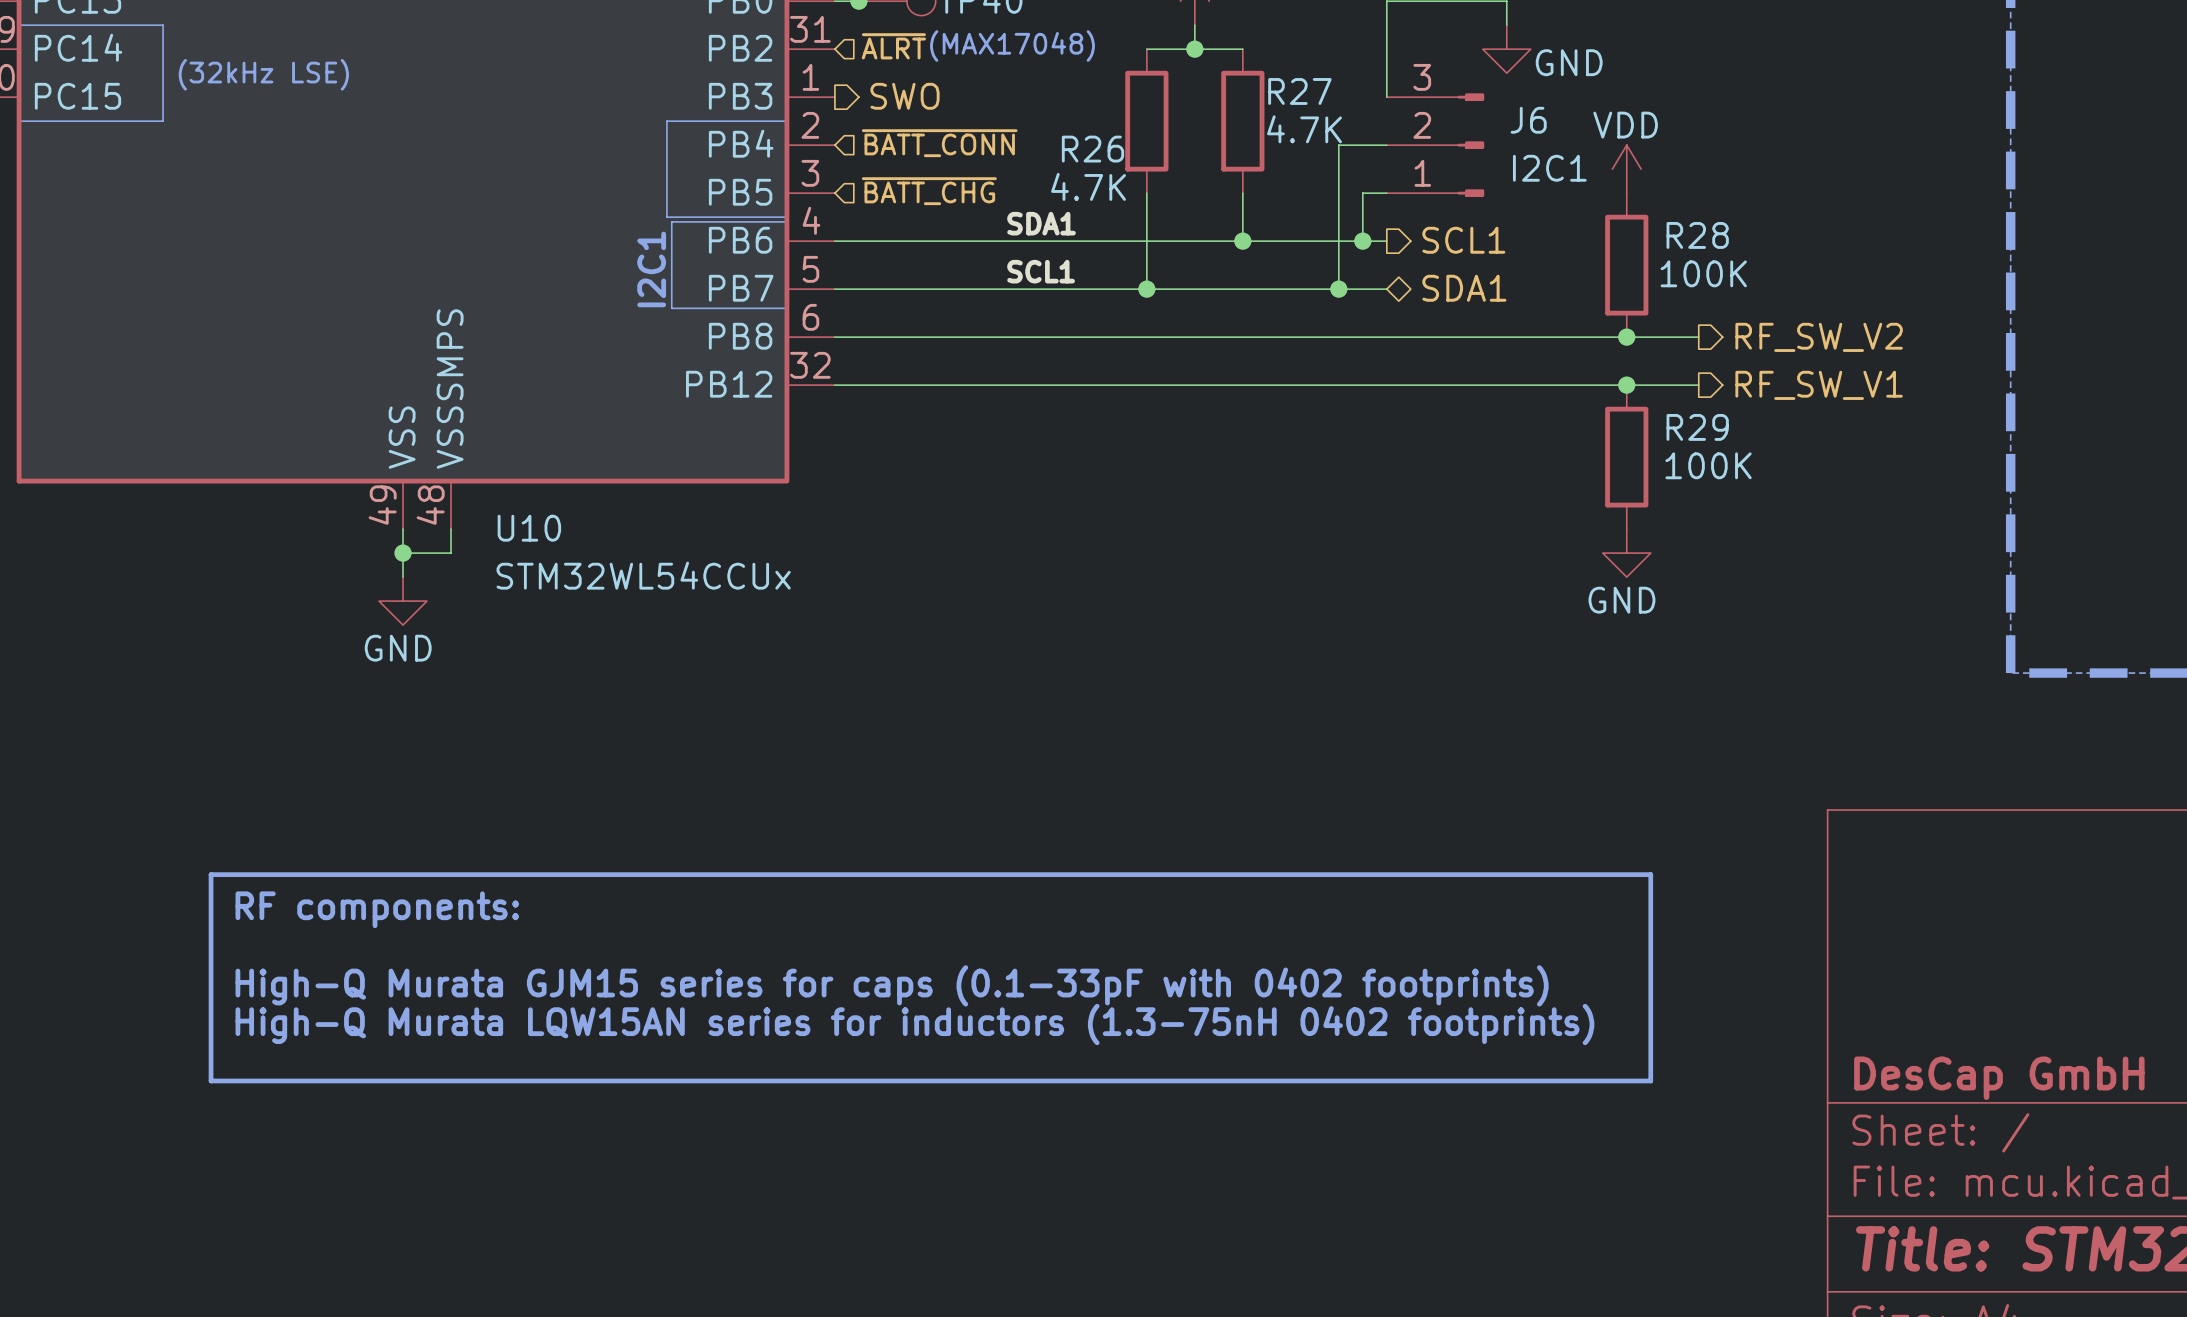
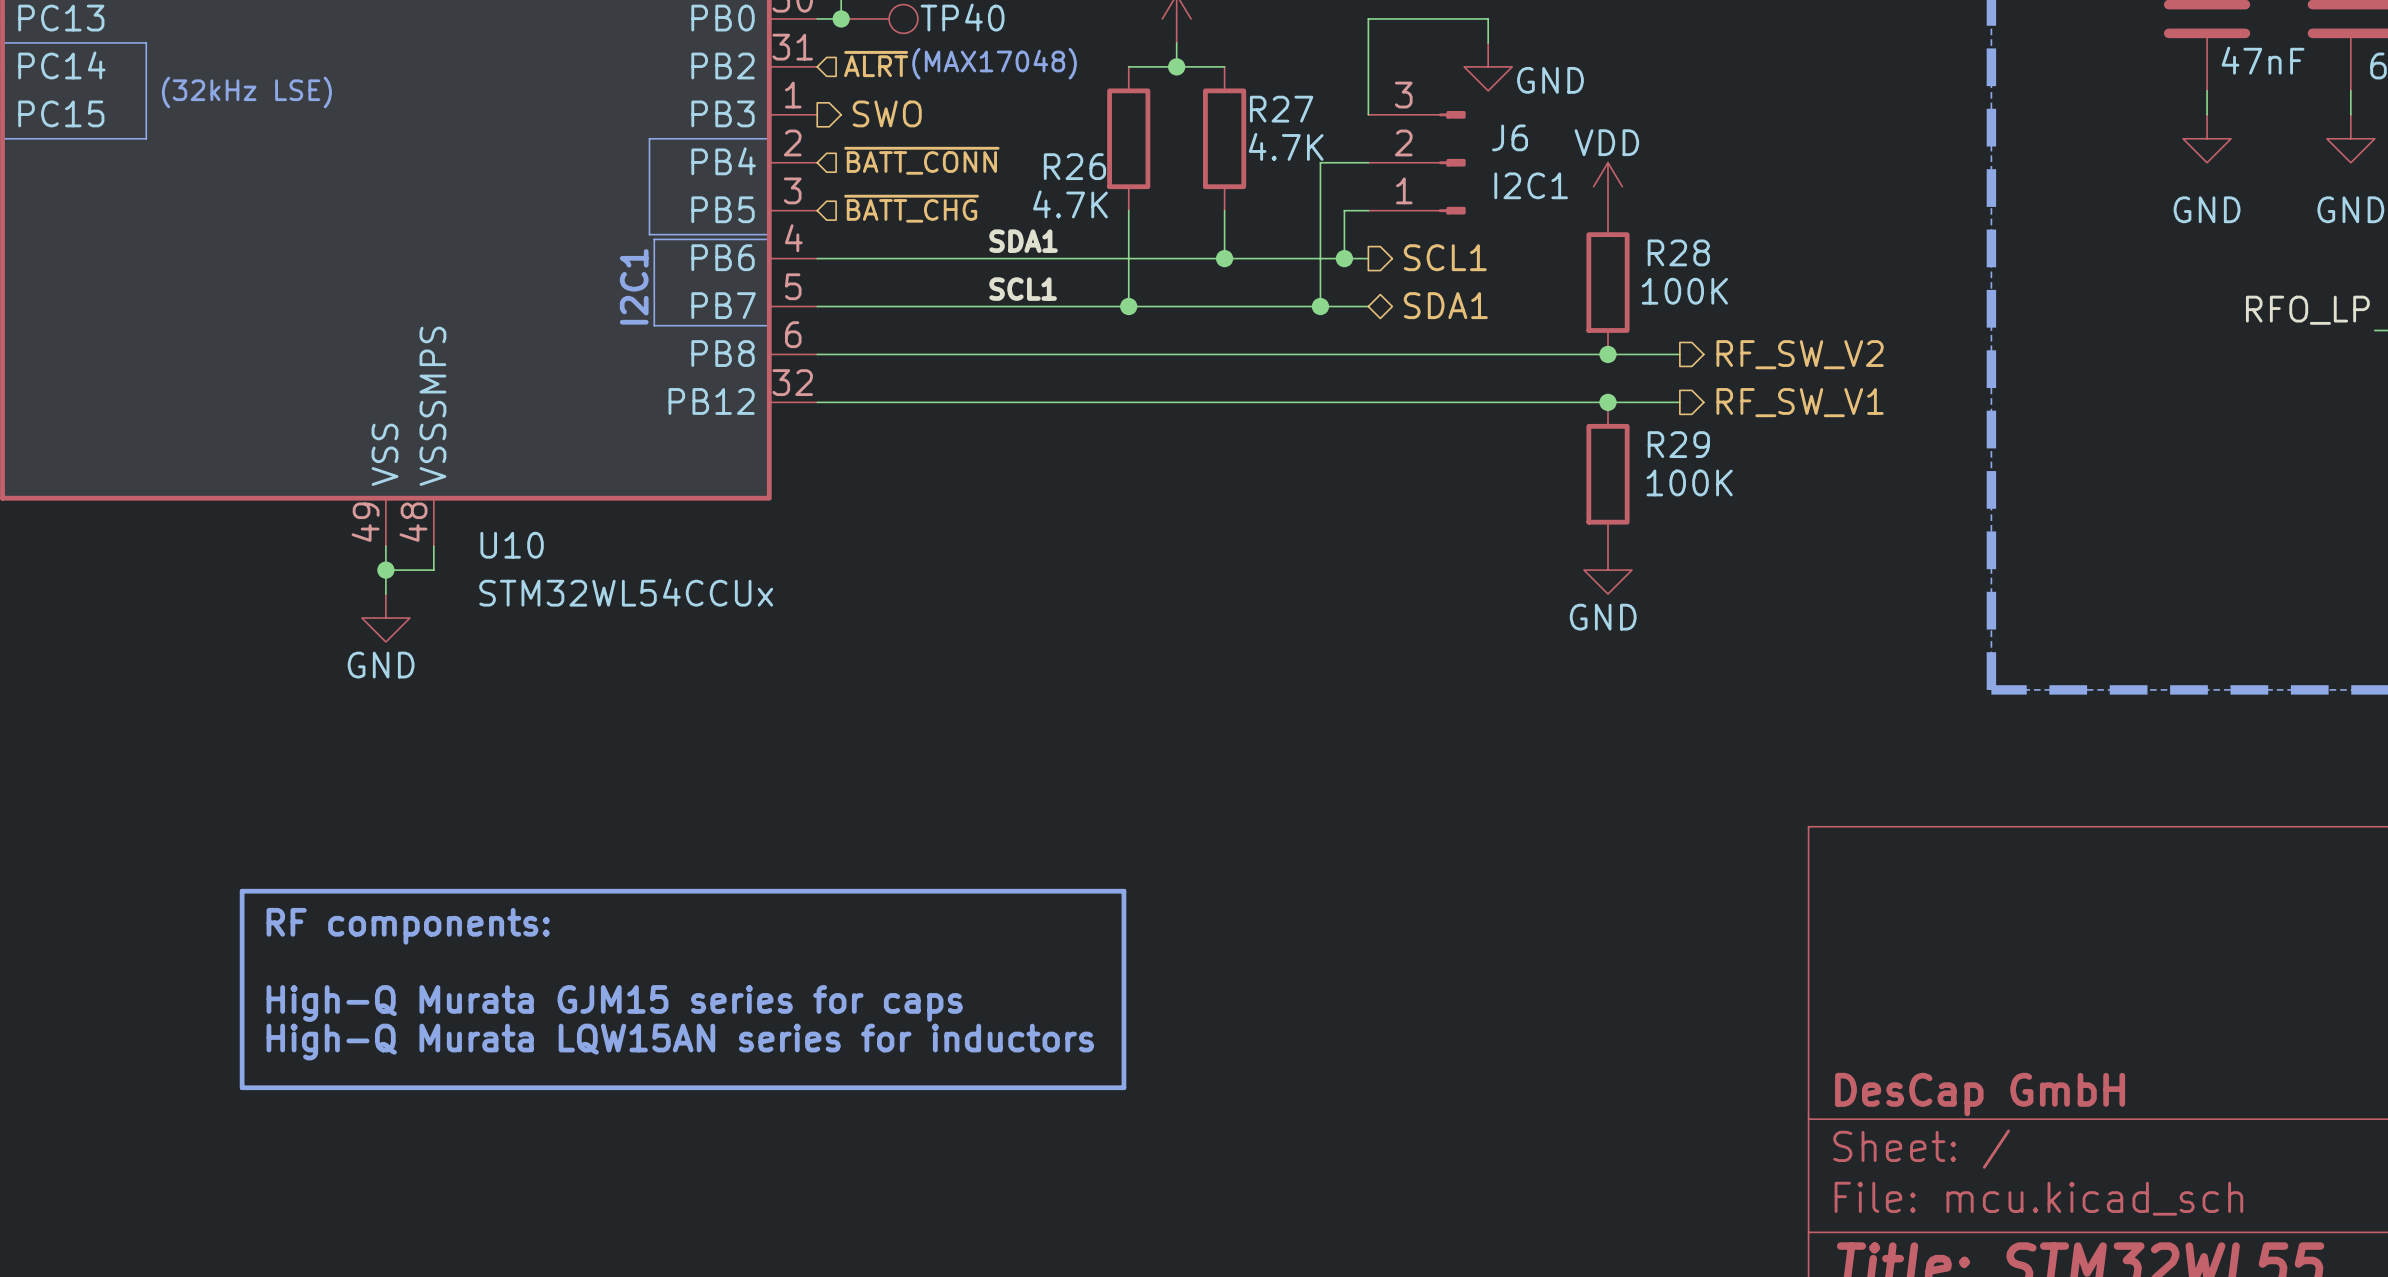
line: (259, 874) (211, 874) (211, 1080) (1650, 1080) (1650, 874) (1142, 874) -> (242, 891) (242, 1087) (1123, 1087) (1123, 891)
text position: RF components: (377, 909) -> RF components: (408, 926)
text: High-Q Murata GJM15 series for caps (0.1-33pF with 0402 footprints) (892, 985) -> High-Q Murata GJM15 series for caps (614, 1003)
text: High-Q Murata LQW15AN series for inductors (1.3-75nH 0402 footprints) (914, 1024) -> High-Q Murata LQW15AN series for inductors (680, 1042)

